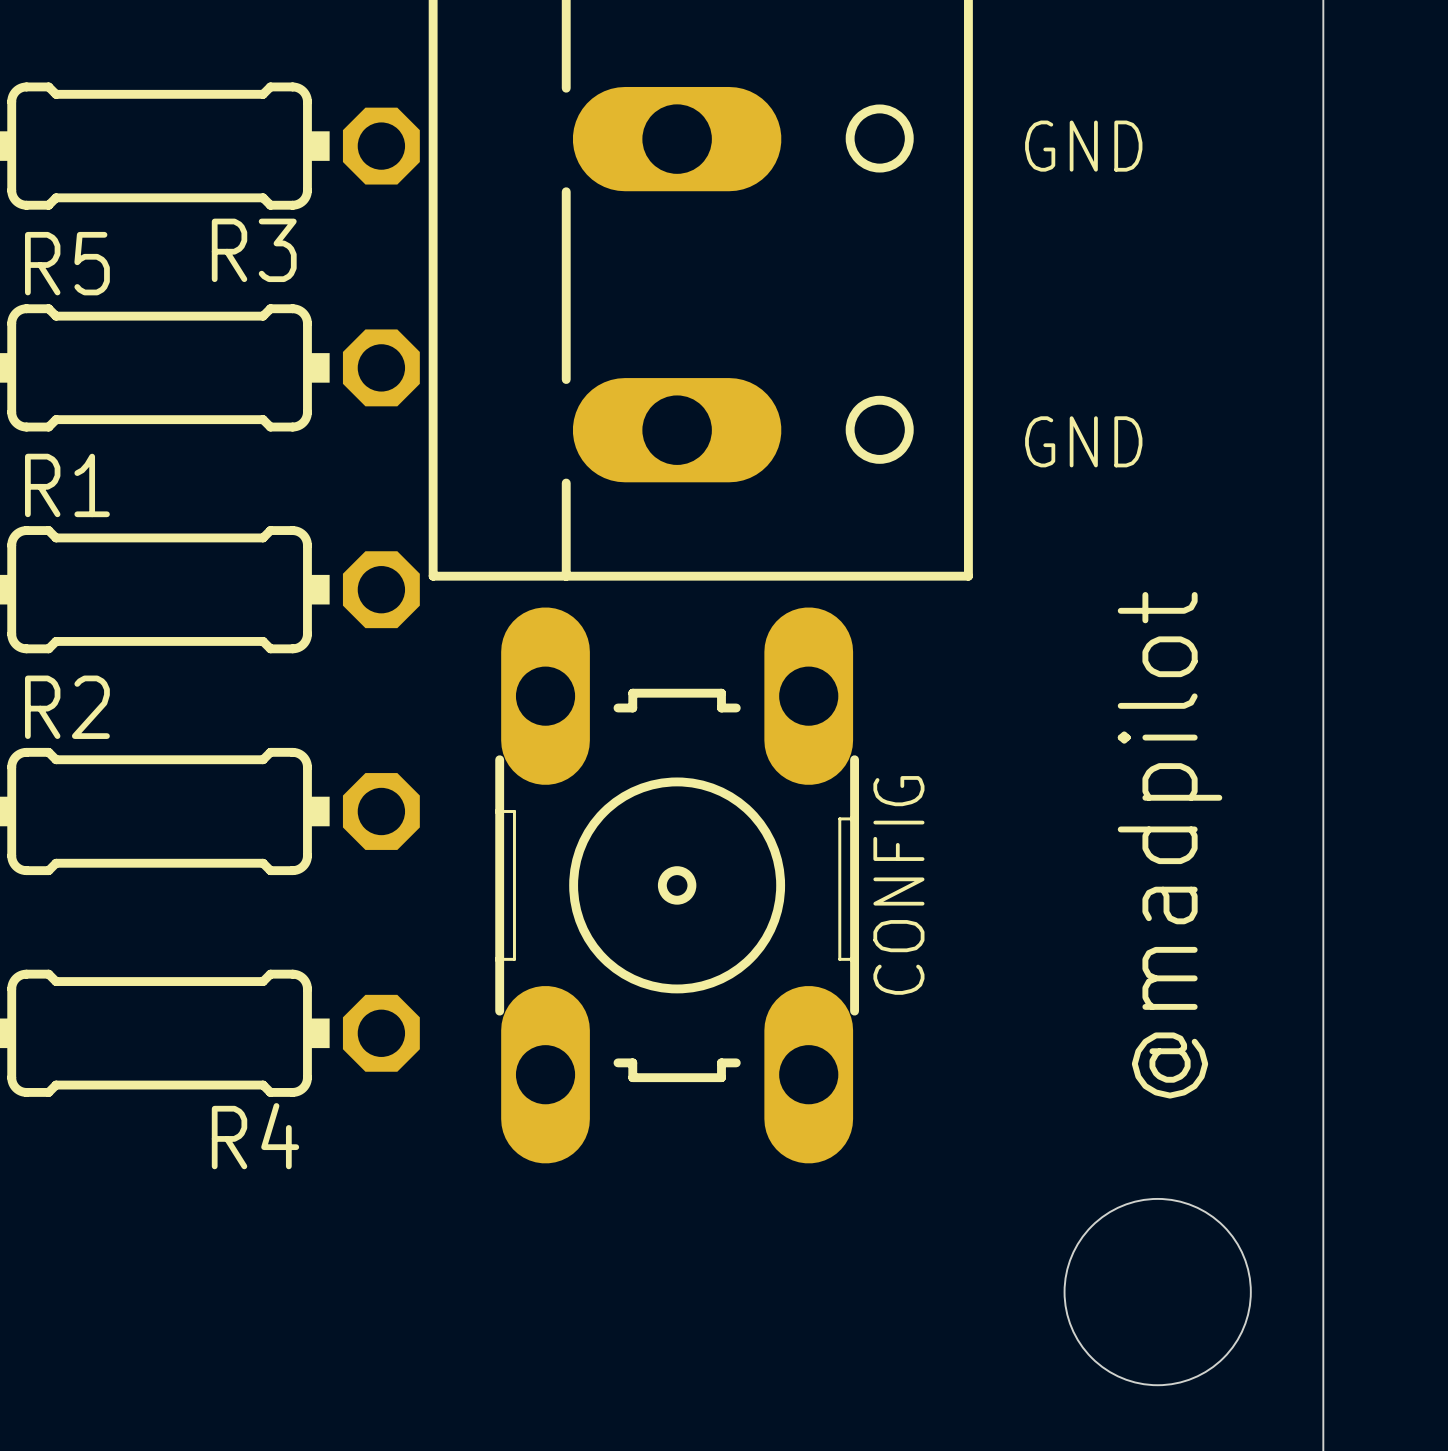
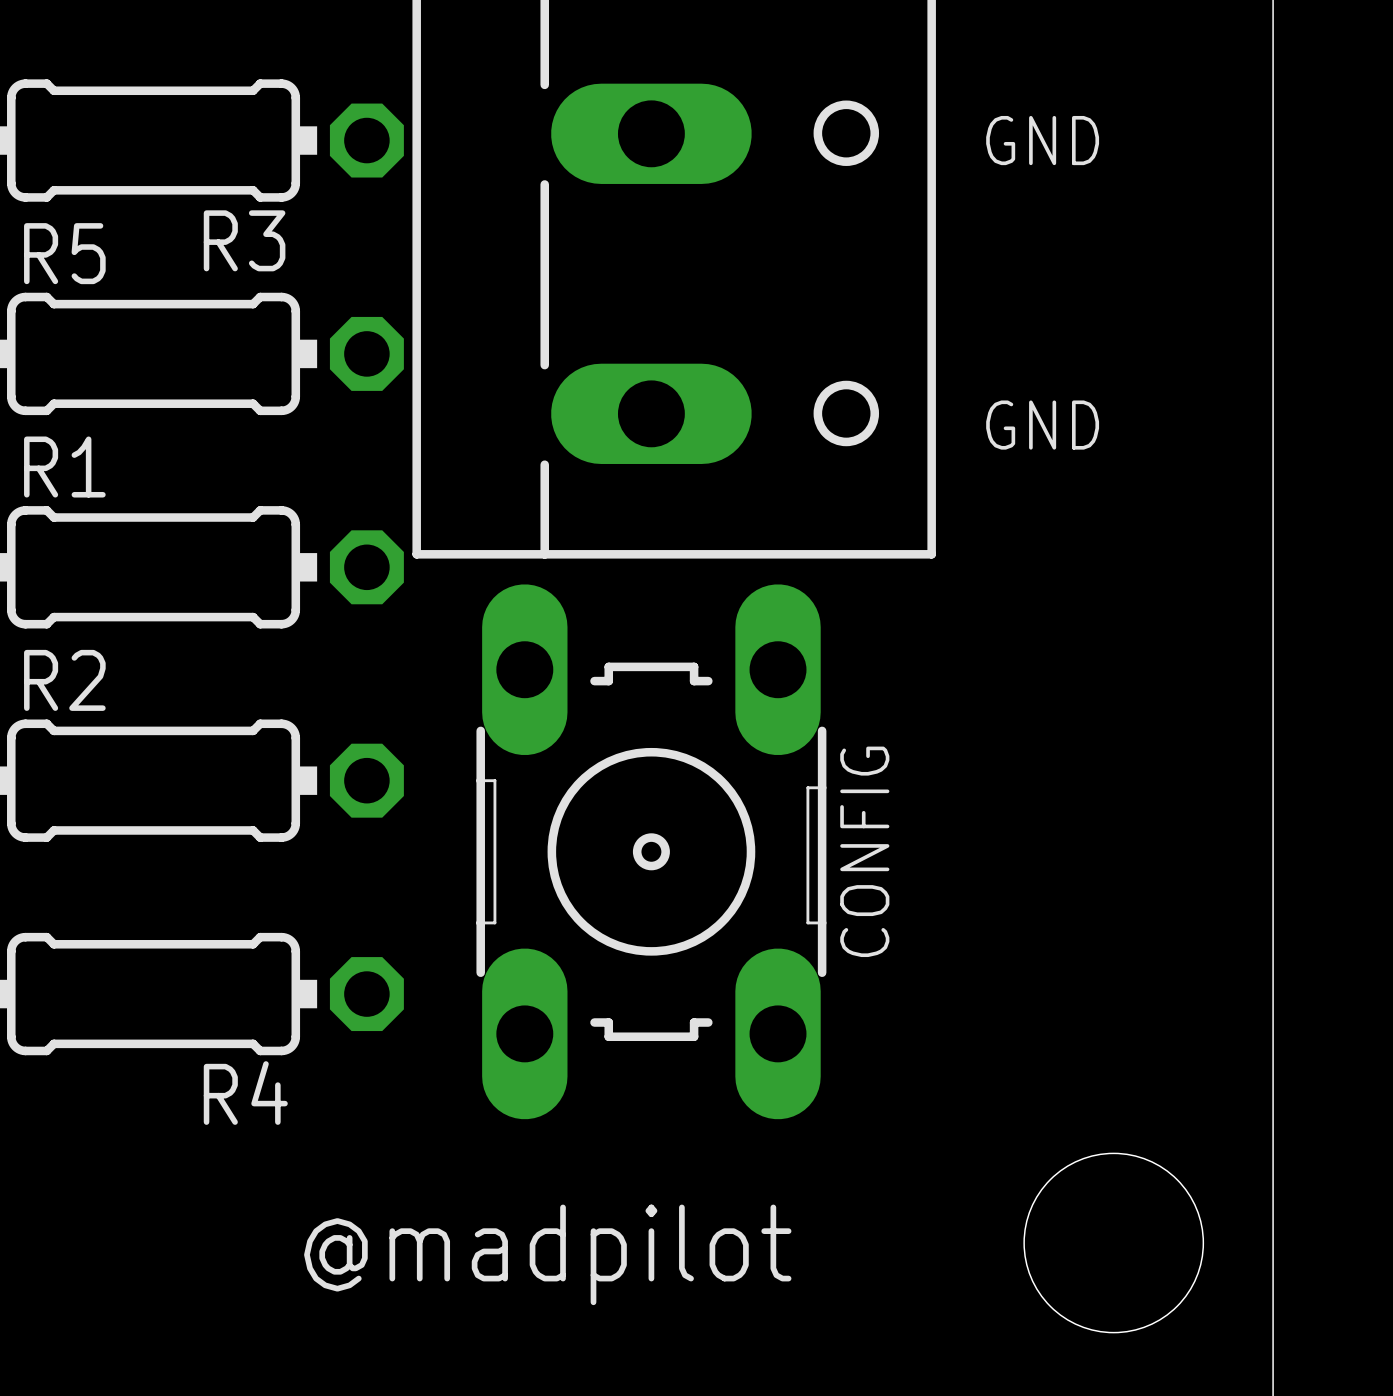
text rotation: 0° (1170, 845) -> 90° clockwise (547, 1254)
text position: @madpilot (1170, 845) -> @madpilot (547, 1254)

